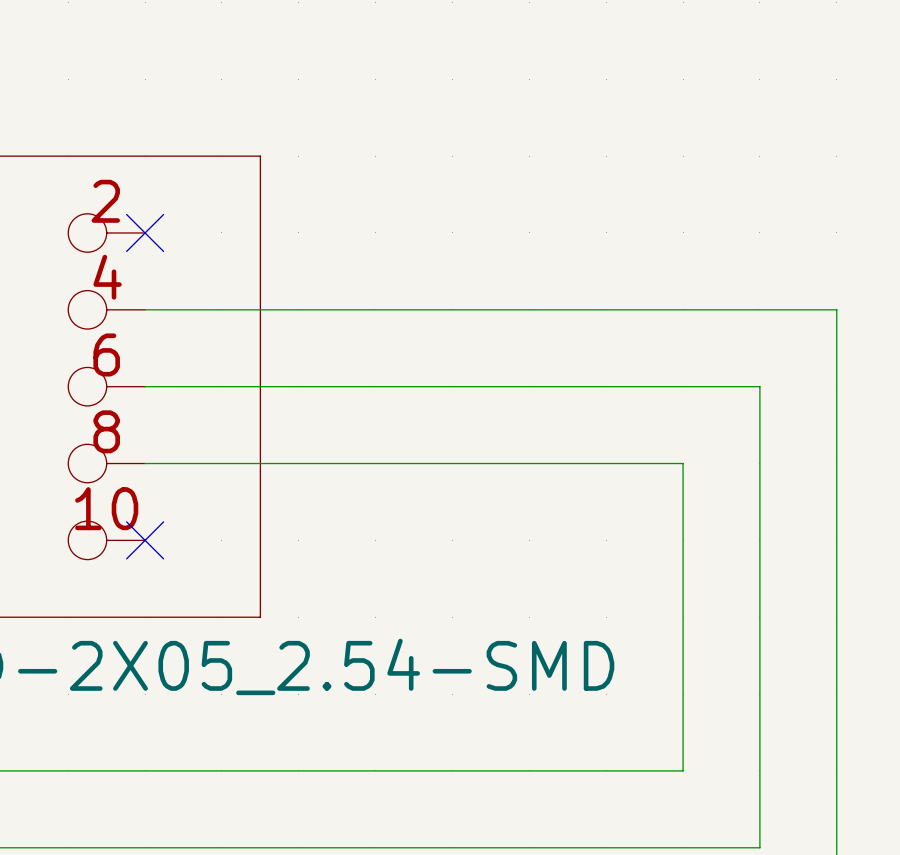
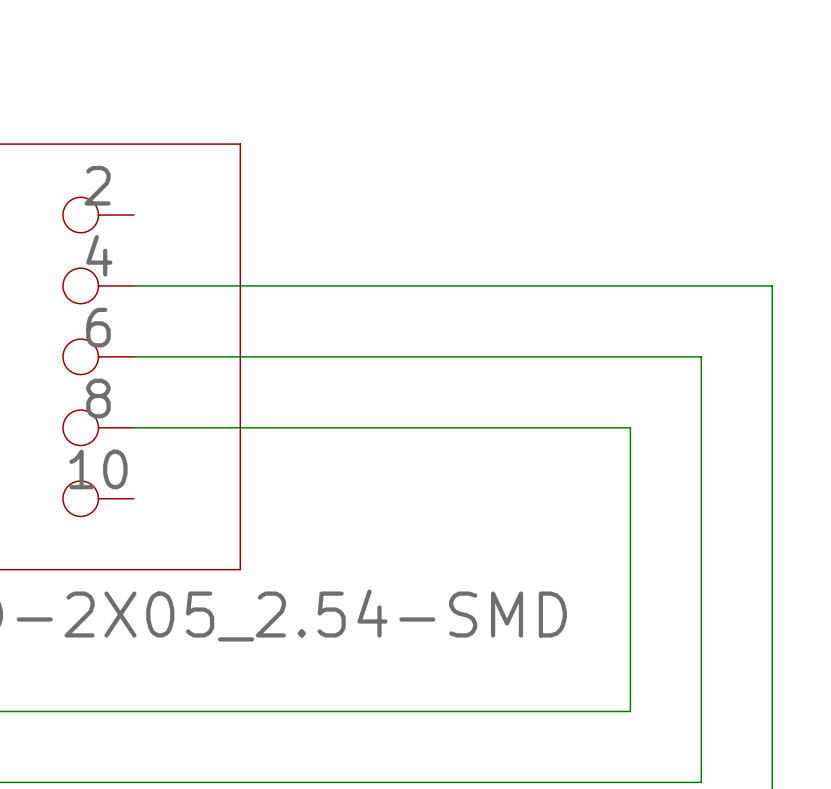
no-connect mark: (145, 232) -> none
no-connect mark: (145, 540) -> none

